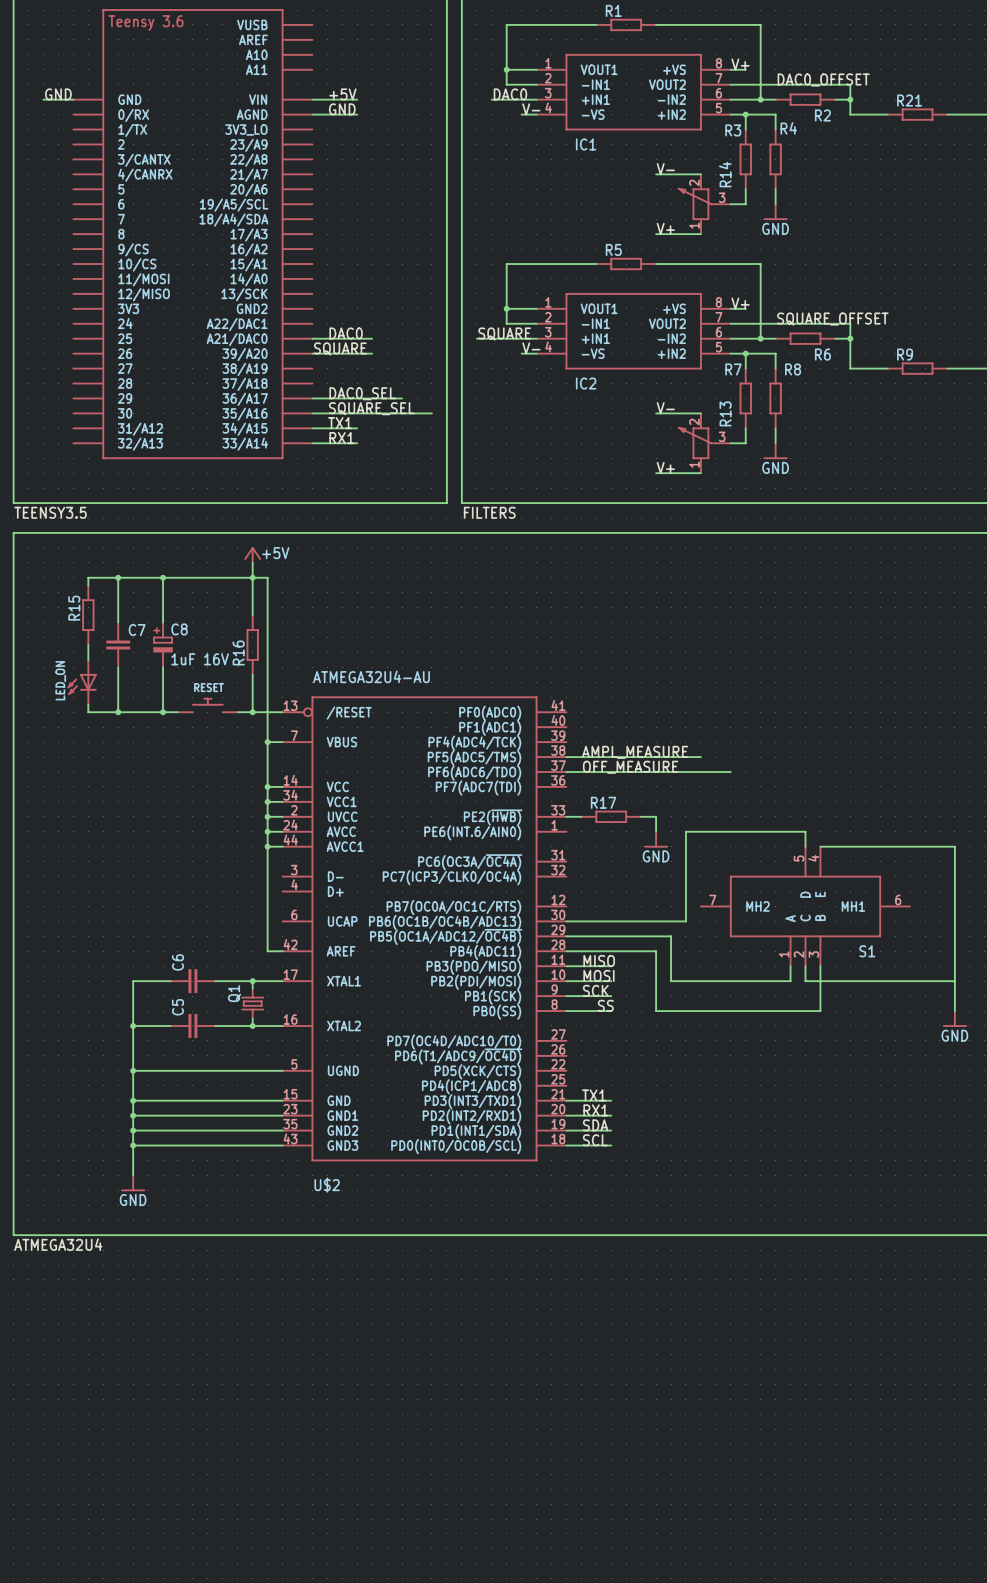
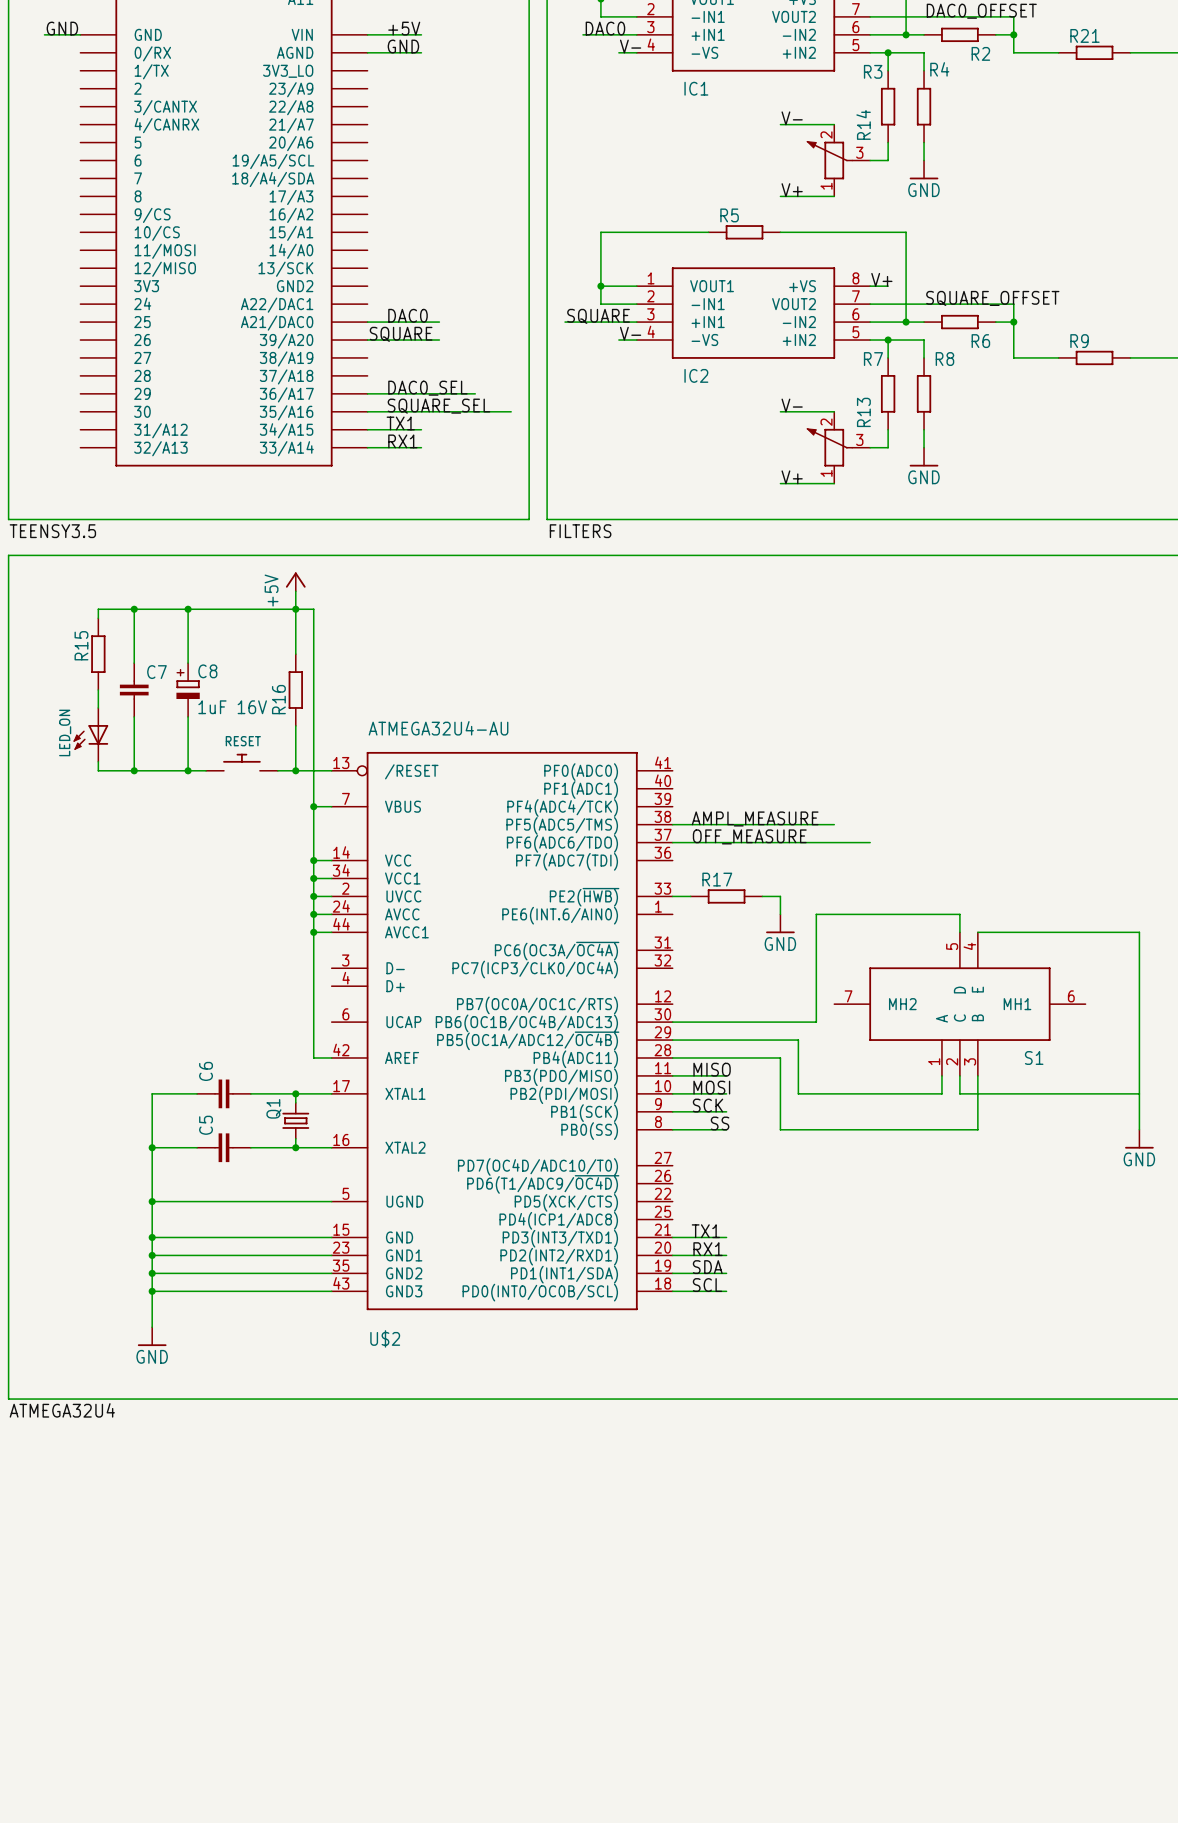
power symbol text rotation: 0° (275, 553) -> 90° counterclockwise (271, 590)
power symbol text position: +5V (275, 553) -> +5V (271, 590)

